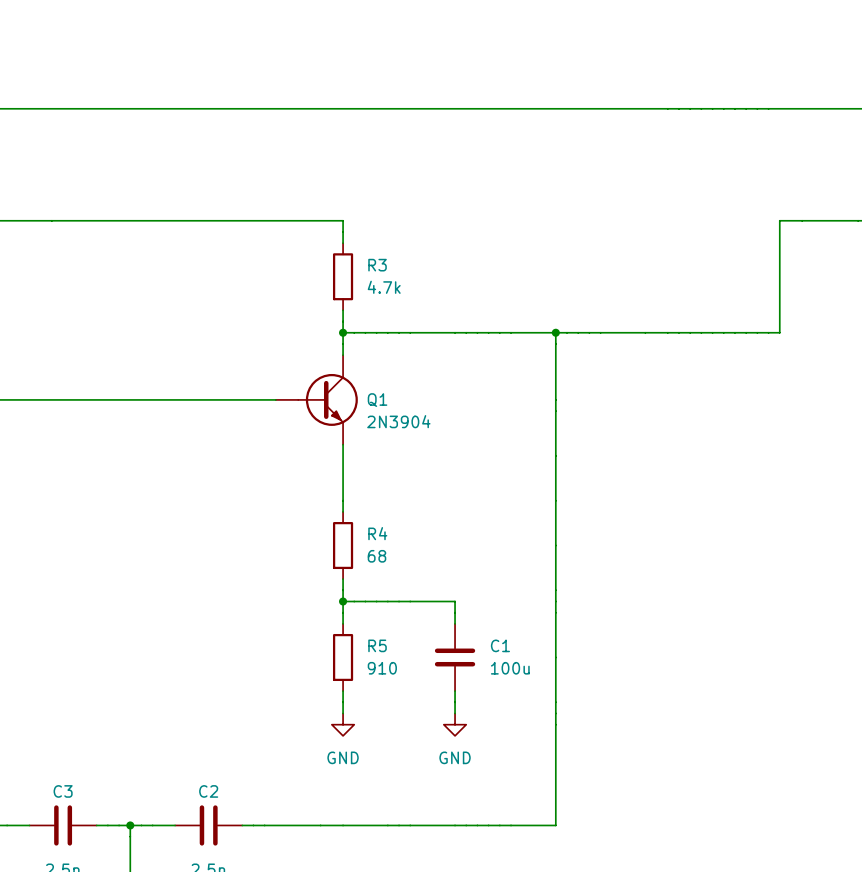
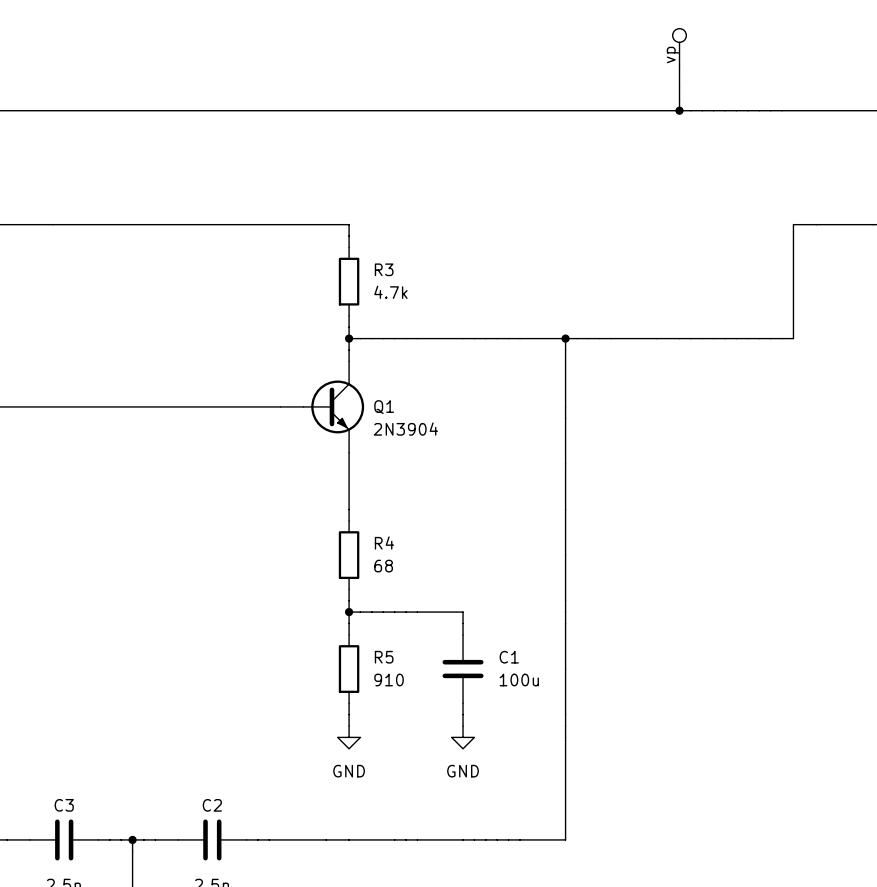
part: none -> (679, 46)
label: none -> vp (673, 55)
wire: none -> (679, 65) (679, 110)
junction: none -> (679, 110)

